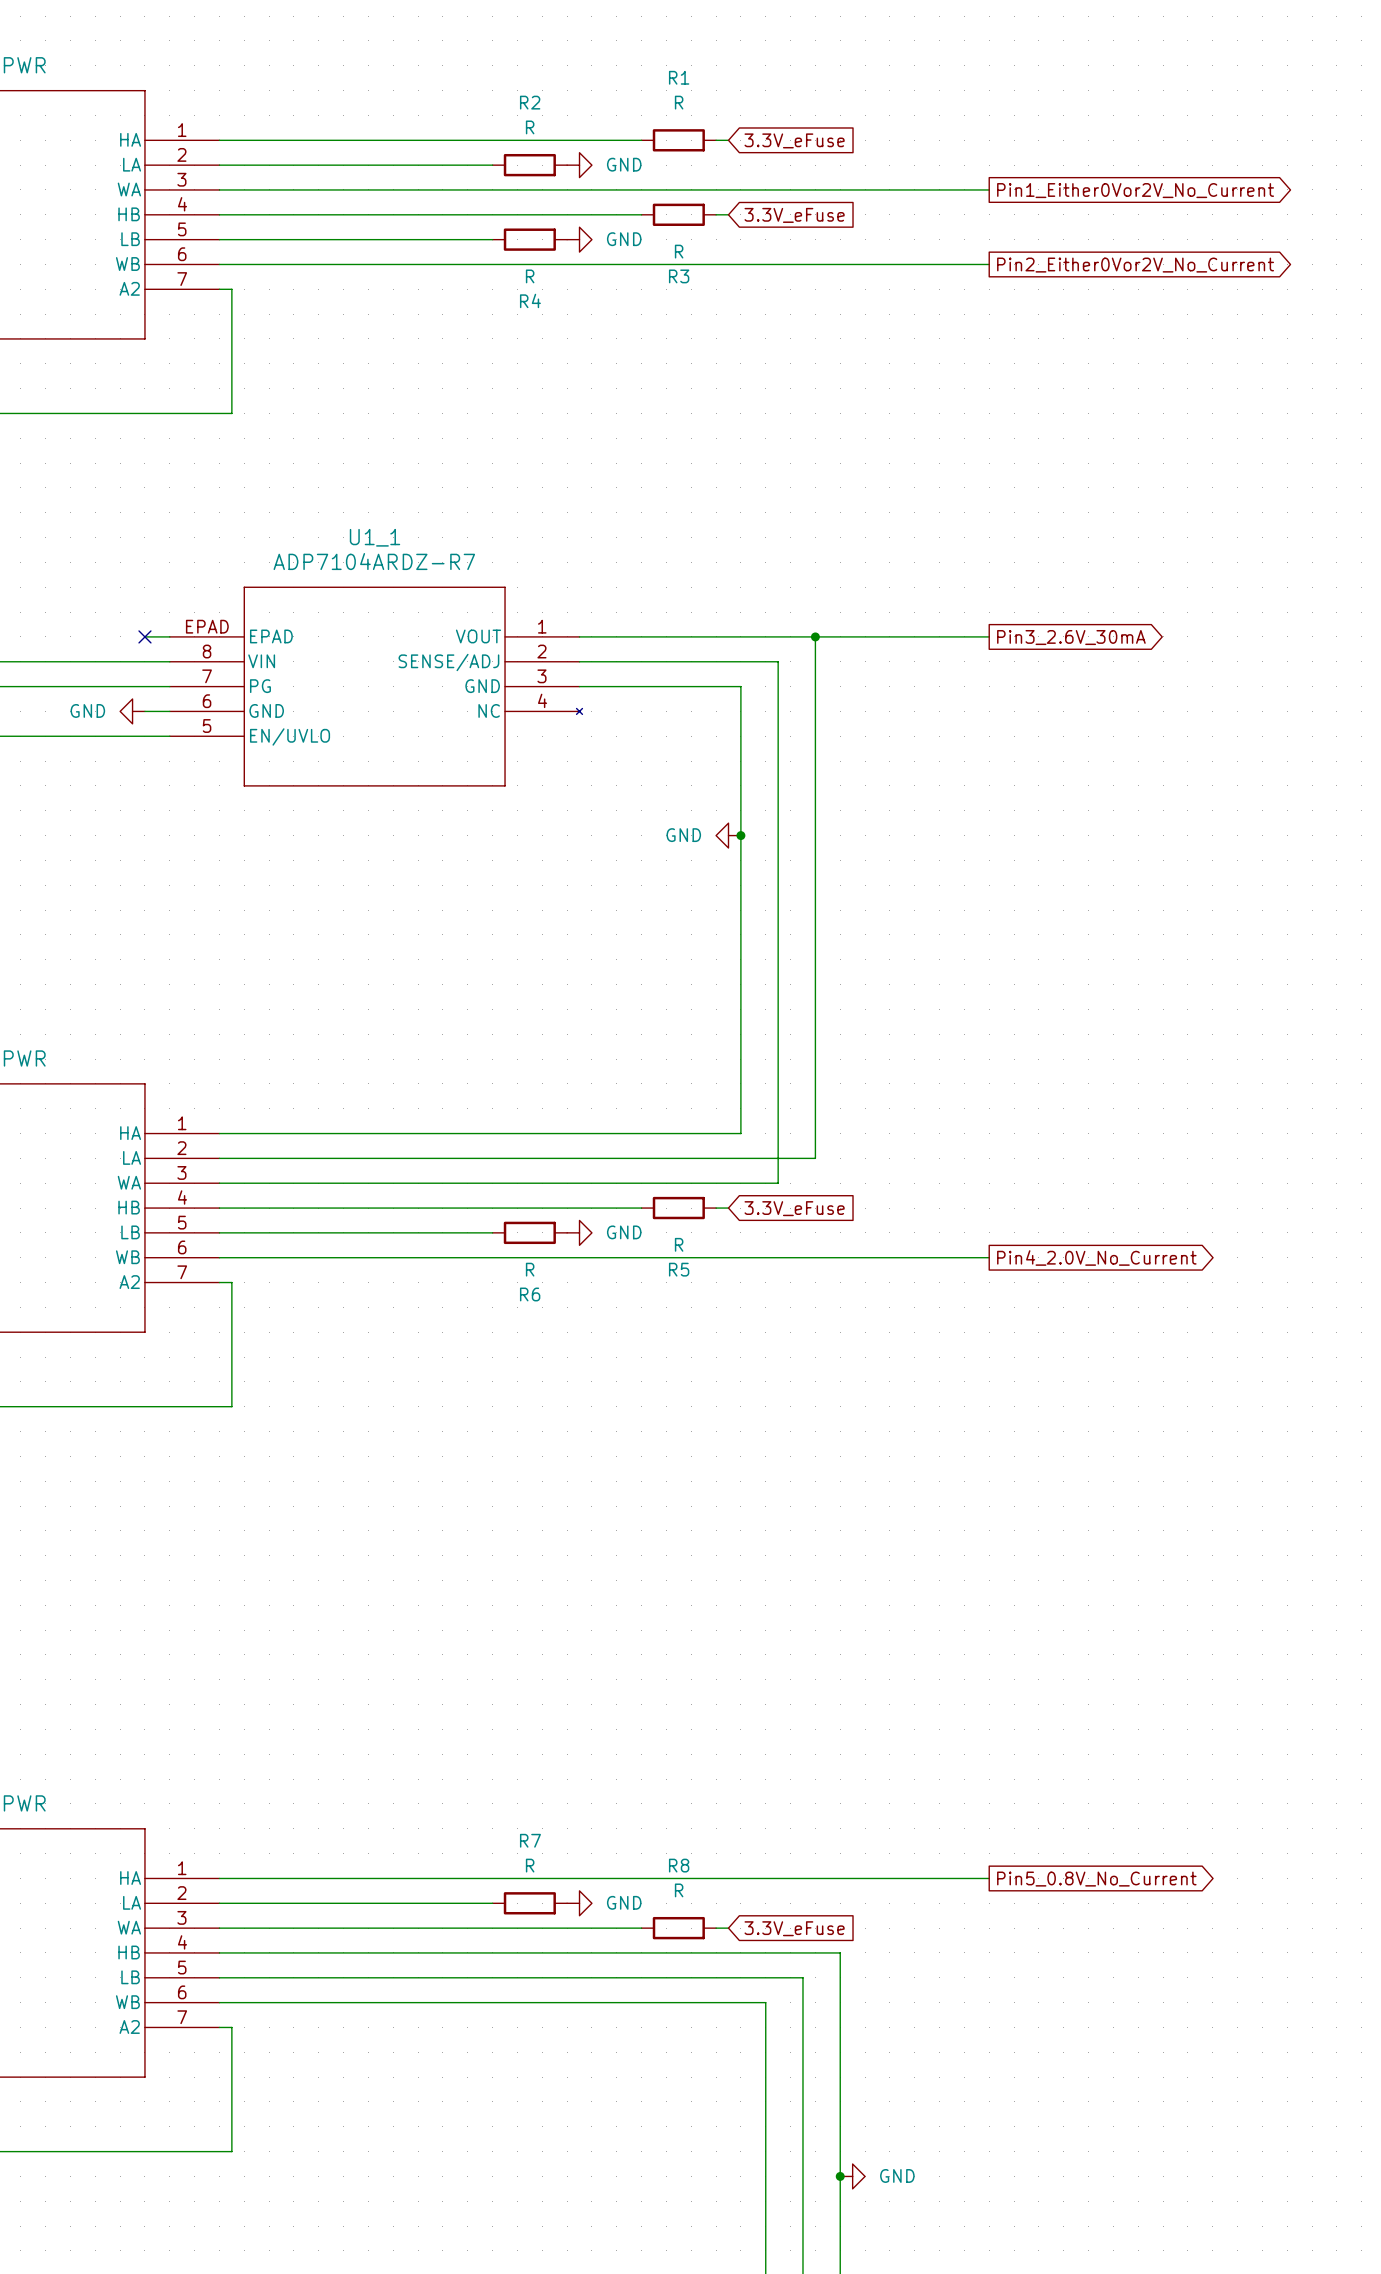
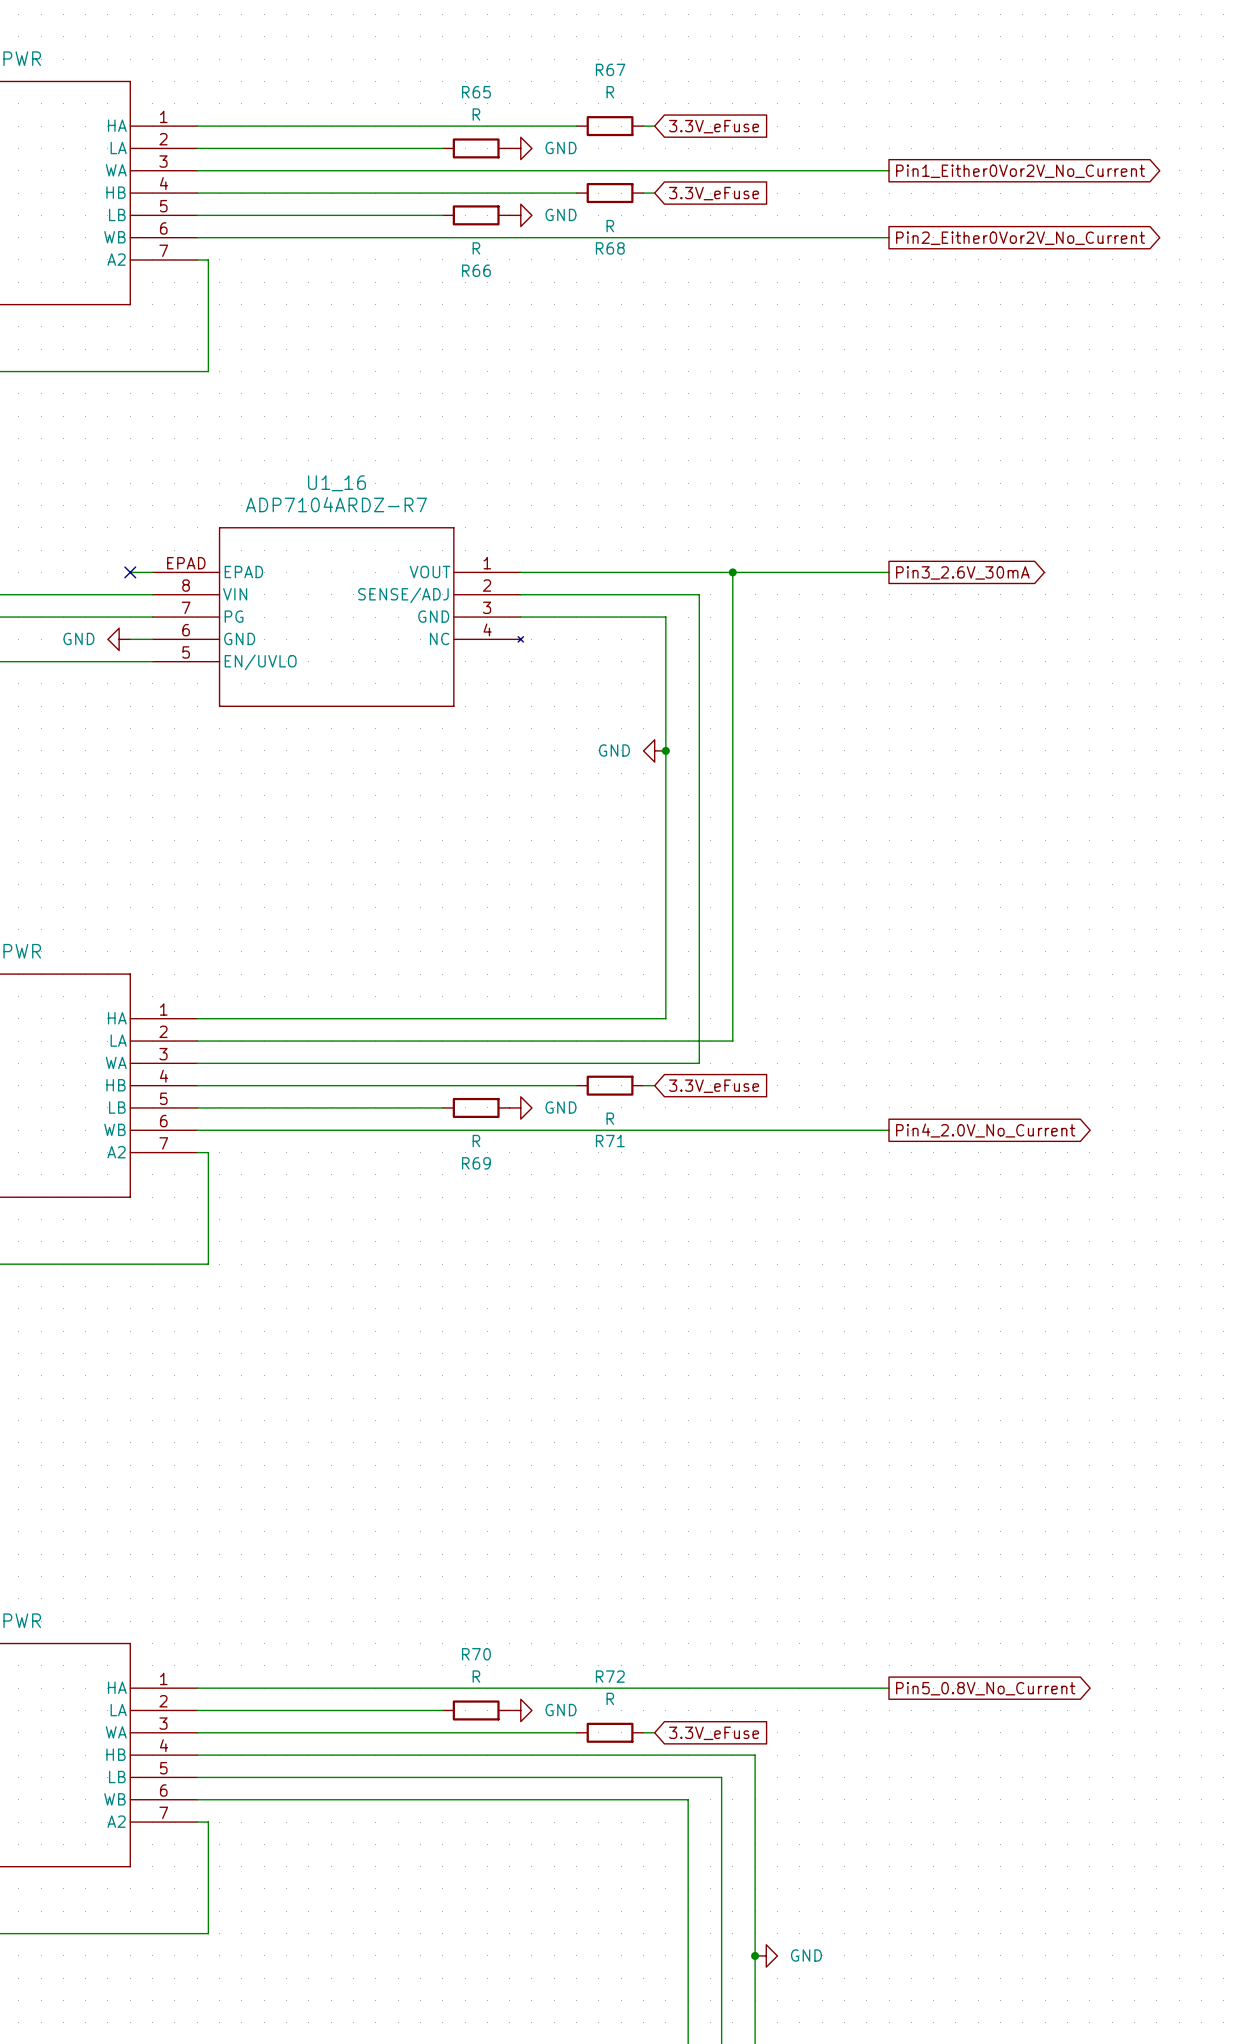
R1 name: R1 (679, 77) -> R67 (610, 69)
R2 name: R2 (530, 102) -> R65 (476, 92)
R3 name: R3 (679, 276) -> R68 (610, 248)
R4 name: R4 (530, 300) -> R66 (476, 270)
U1_1 name: U1_1 (375, 537) -> U1_16 (337, 483)
R5 name: R5 (679, 1269) -> R71 (610, 1141)
R6 name: R6 (530, 1294) -> R69 (476, 1163)
R7 name: R7 (530, 1840) -> R70 (476, 1654)
R8 name: R8 (679, 1865) -> R72 (610, 1676)

